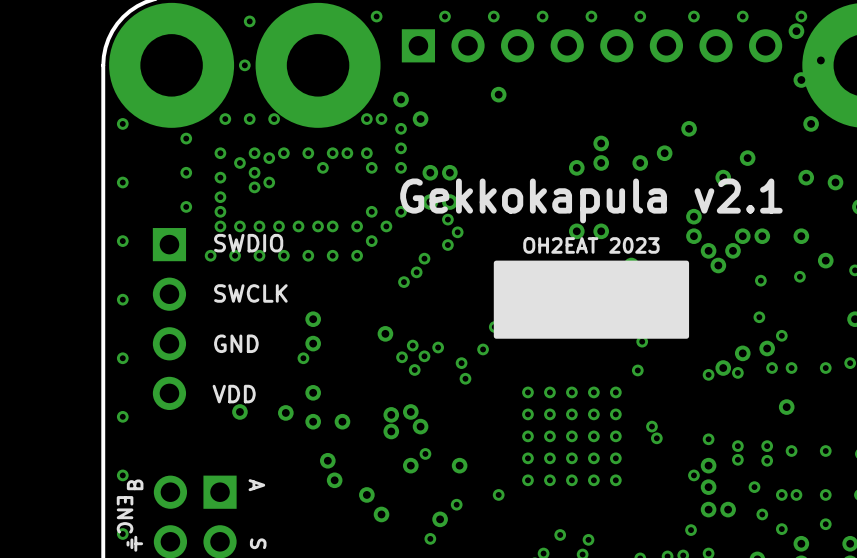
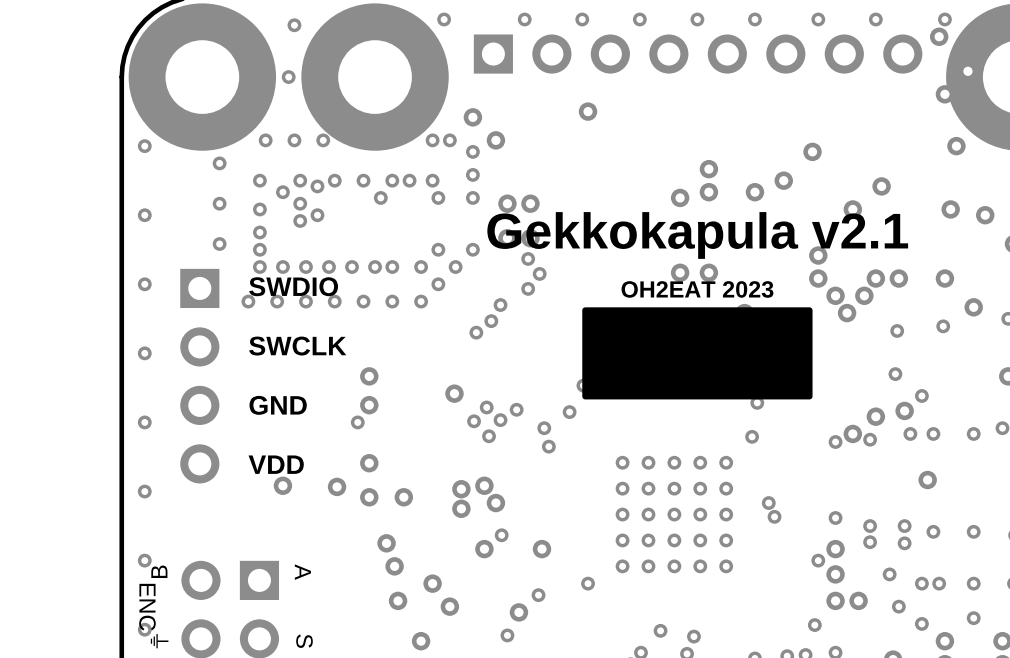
via: none -> (398, 600)
via: none -> (421, 641)

